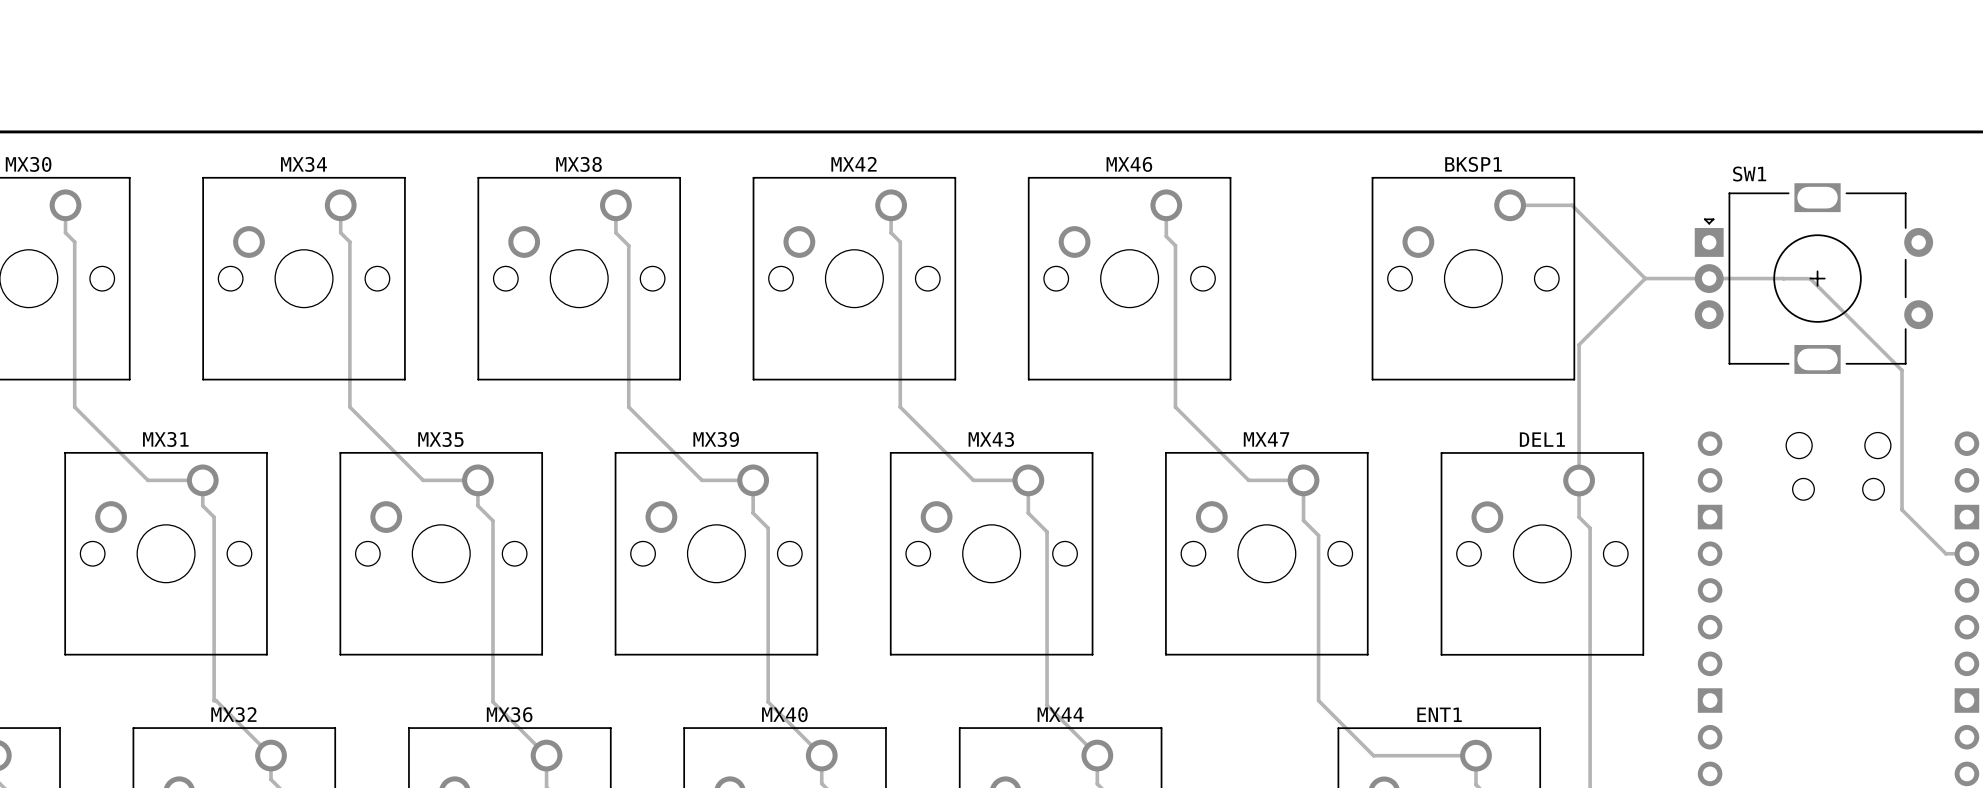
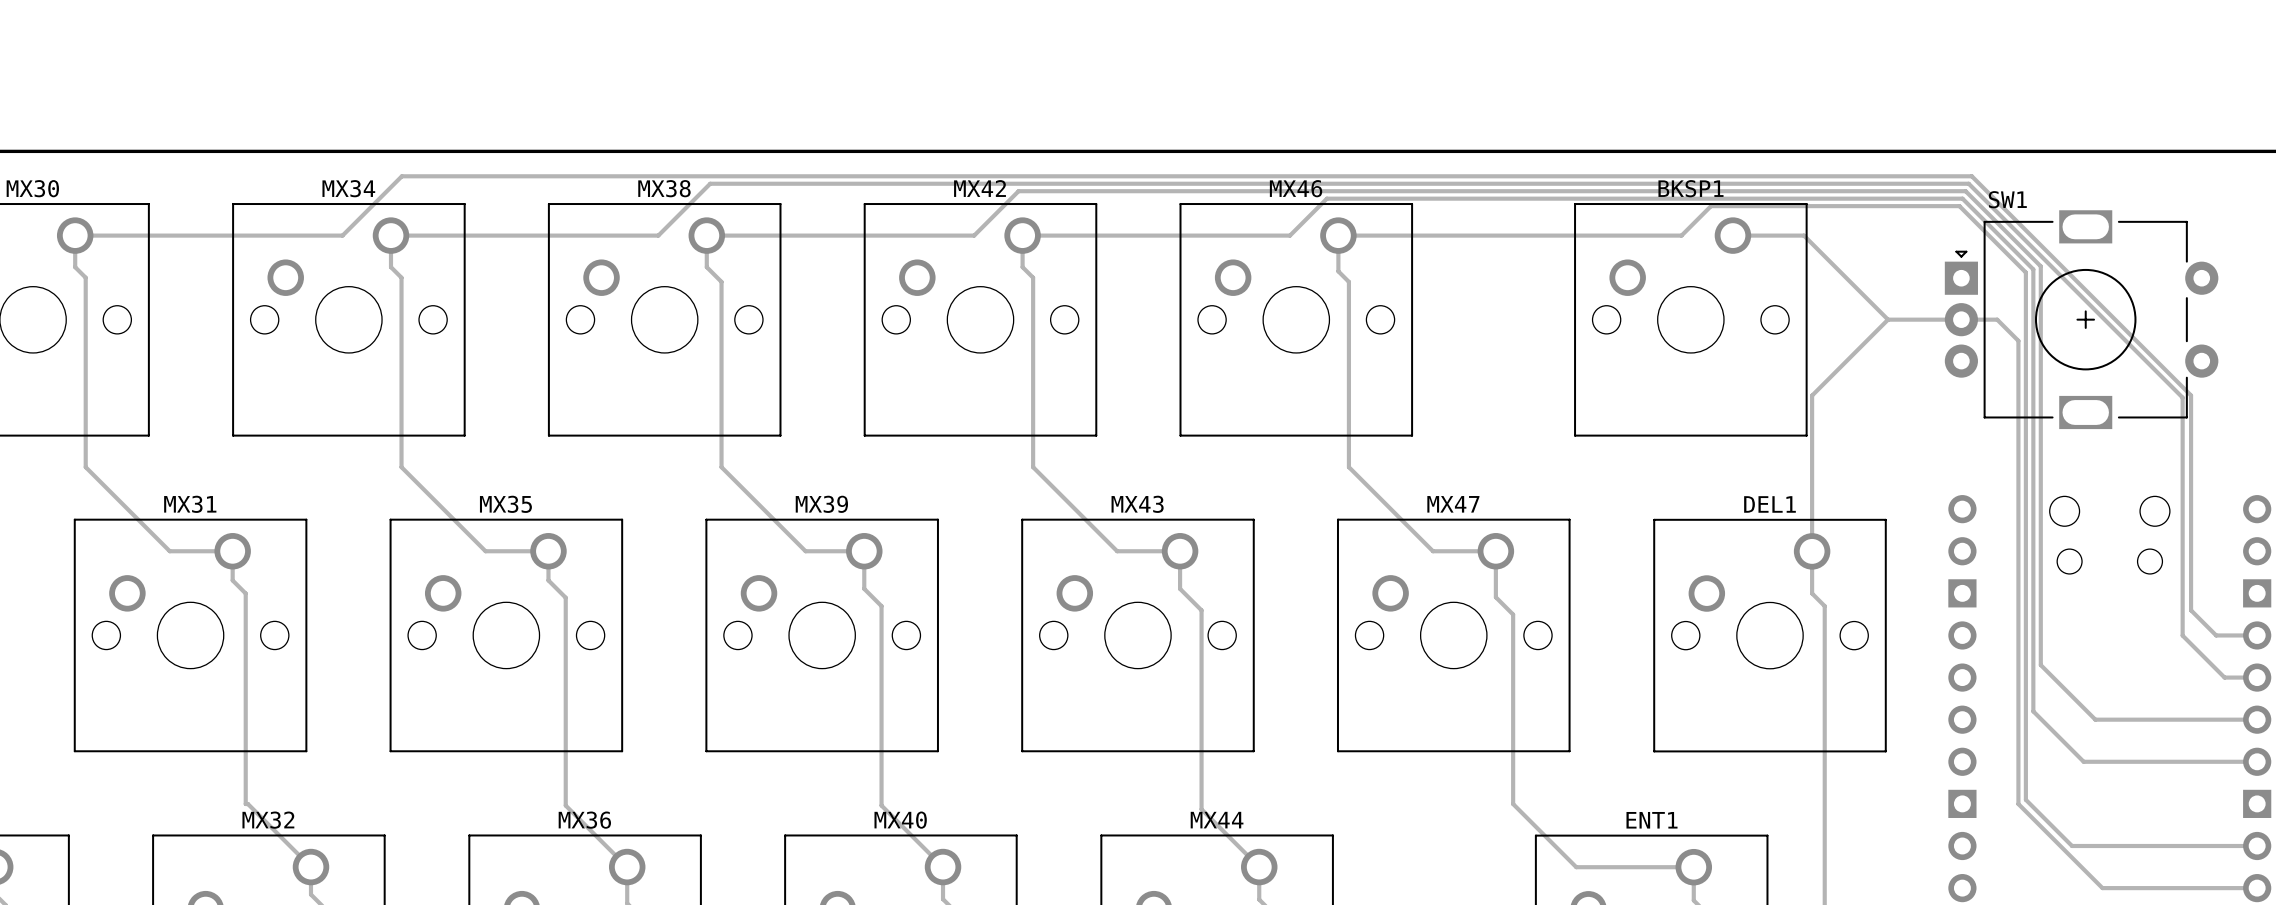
track: none -> (75, 235) (342, 235) (401, 176) (1971, 176) (2191, 395) (2191, 610) (2216, 635) (2233, 635)
track: none -> (706, 235) (974, 235) (1018, 191) (1965, 191) (2040, 266) (2040, 665) (2095, 719) (2257, 719)
track: none -> (1022, 235) (1289, 235) (1326, 198) (1962, 198) (2033, 269) (2033, 711) (2083, 761) (2257, 761)
track: none -> (1338, 235) (1681, 235) (1711, 206) (1959, 206) (2025, 272) (2025, 799) (2072, 846) (2257, 846)
track: (1740, 278) (1783, 278) -> (1997, 319) (2018, 340) (2018, 804) (2102, 888) (2257, 888)
track: (1783, 278) (1810, 278) (1901, 370) -> (390, 235) (658, 235) (710, 183) (1968, 183) (2182, 397) (2182, 425)
track: (1901, 509) (1945, 553) -> (2182, 585) (2182, 635) (2224, 677) (2257, 677)

